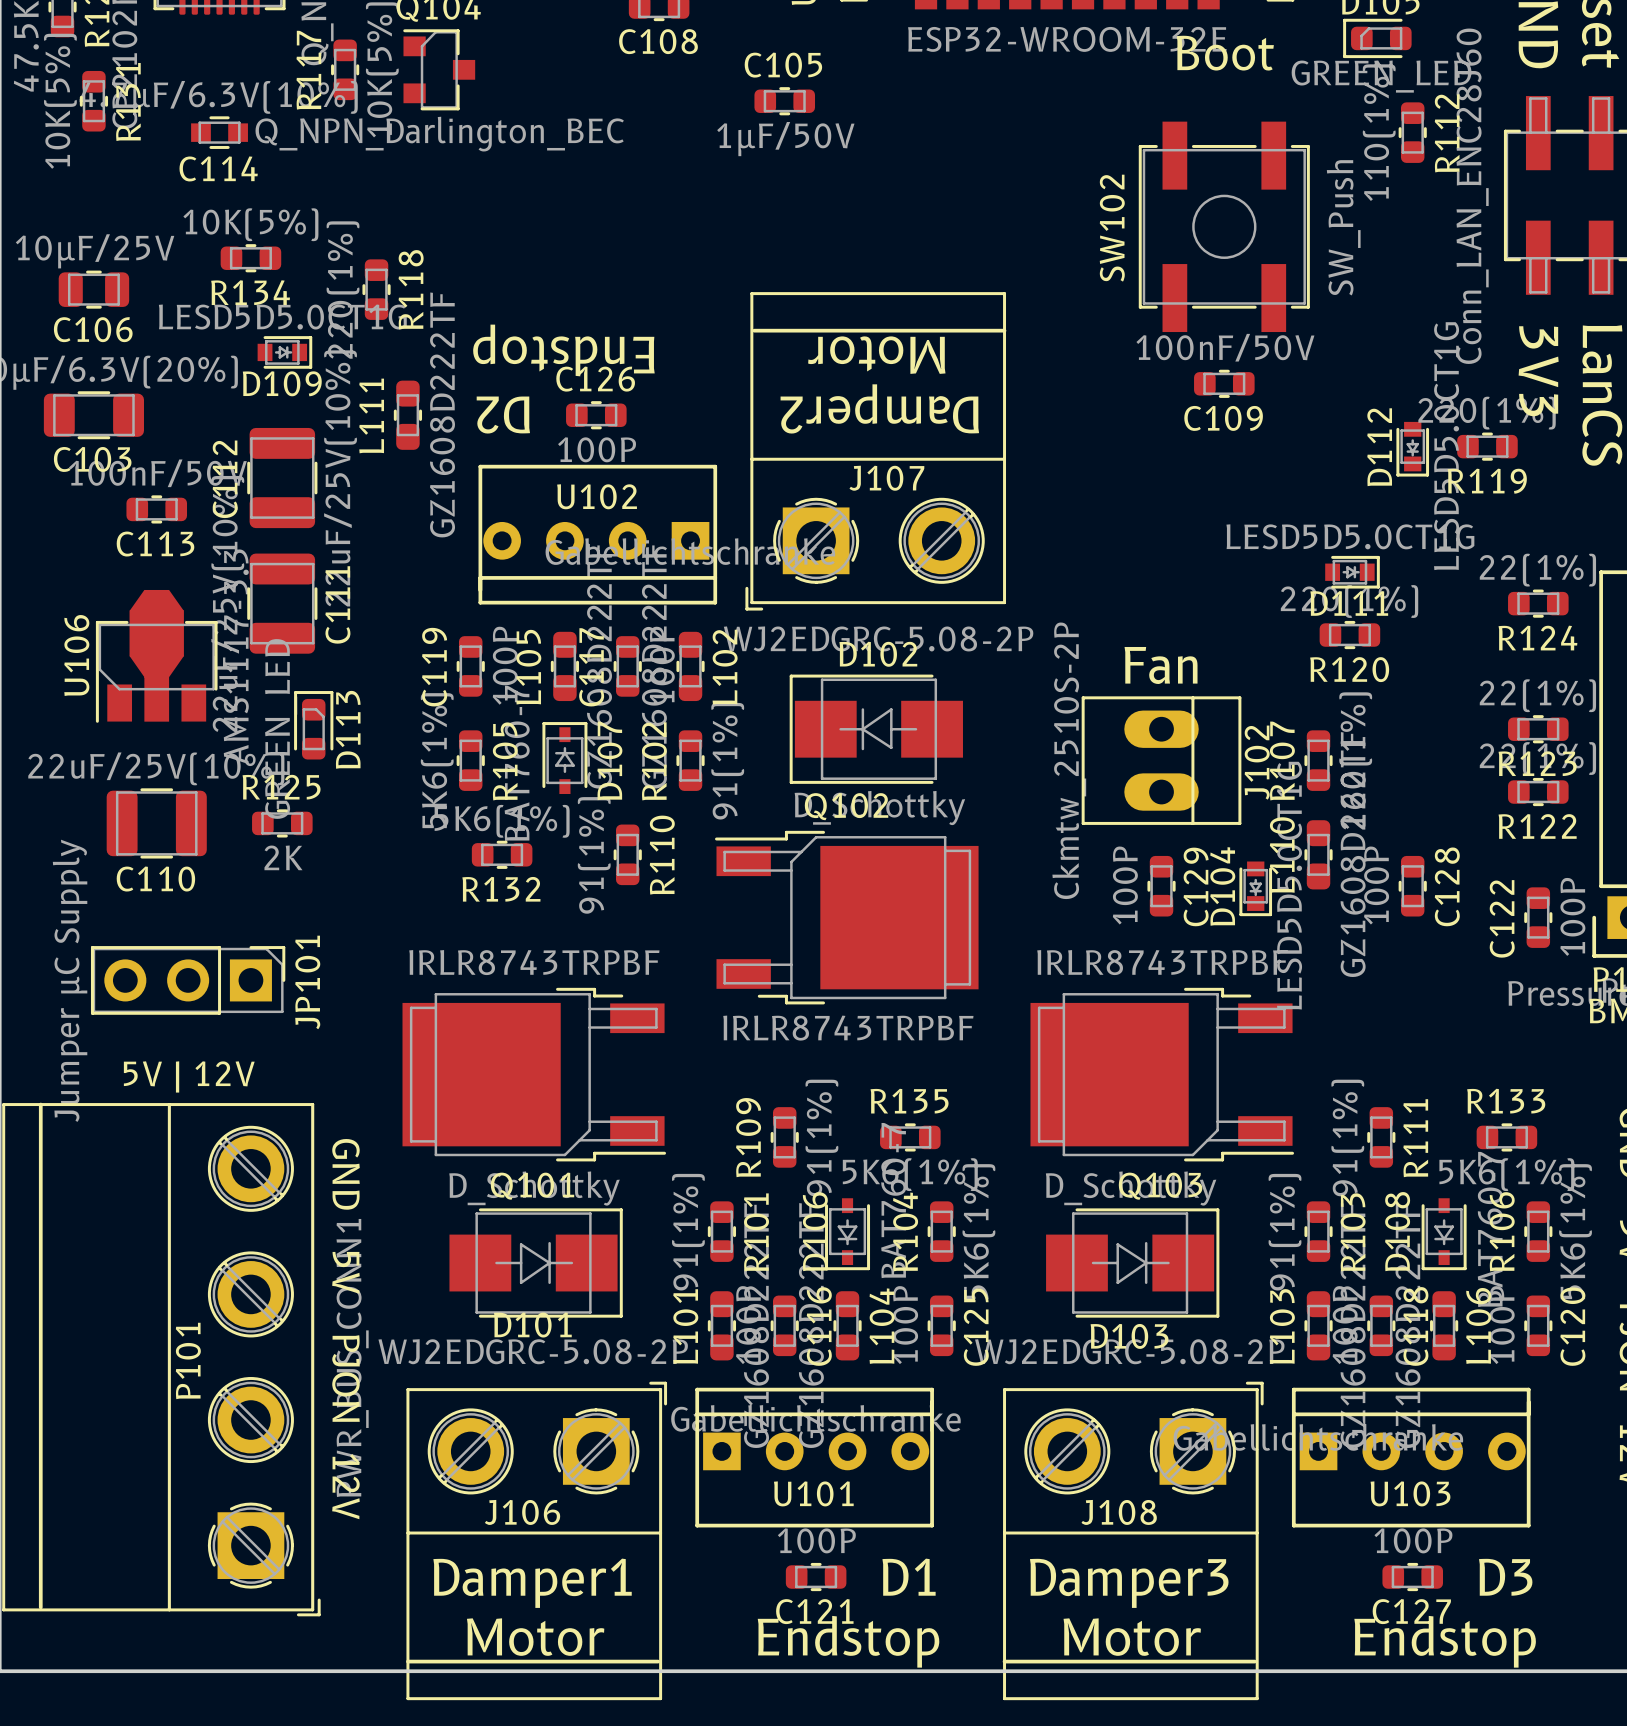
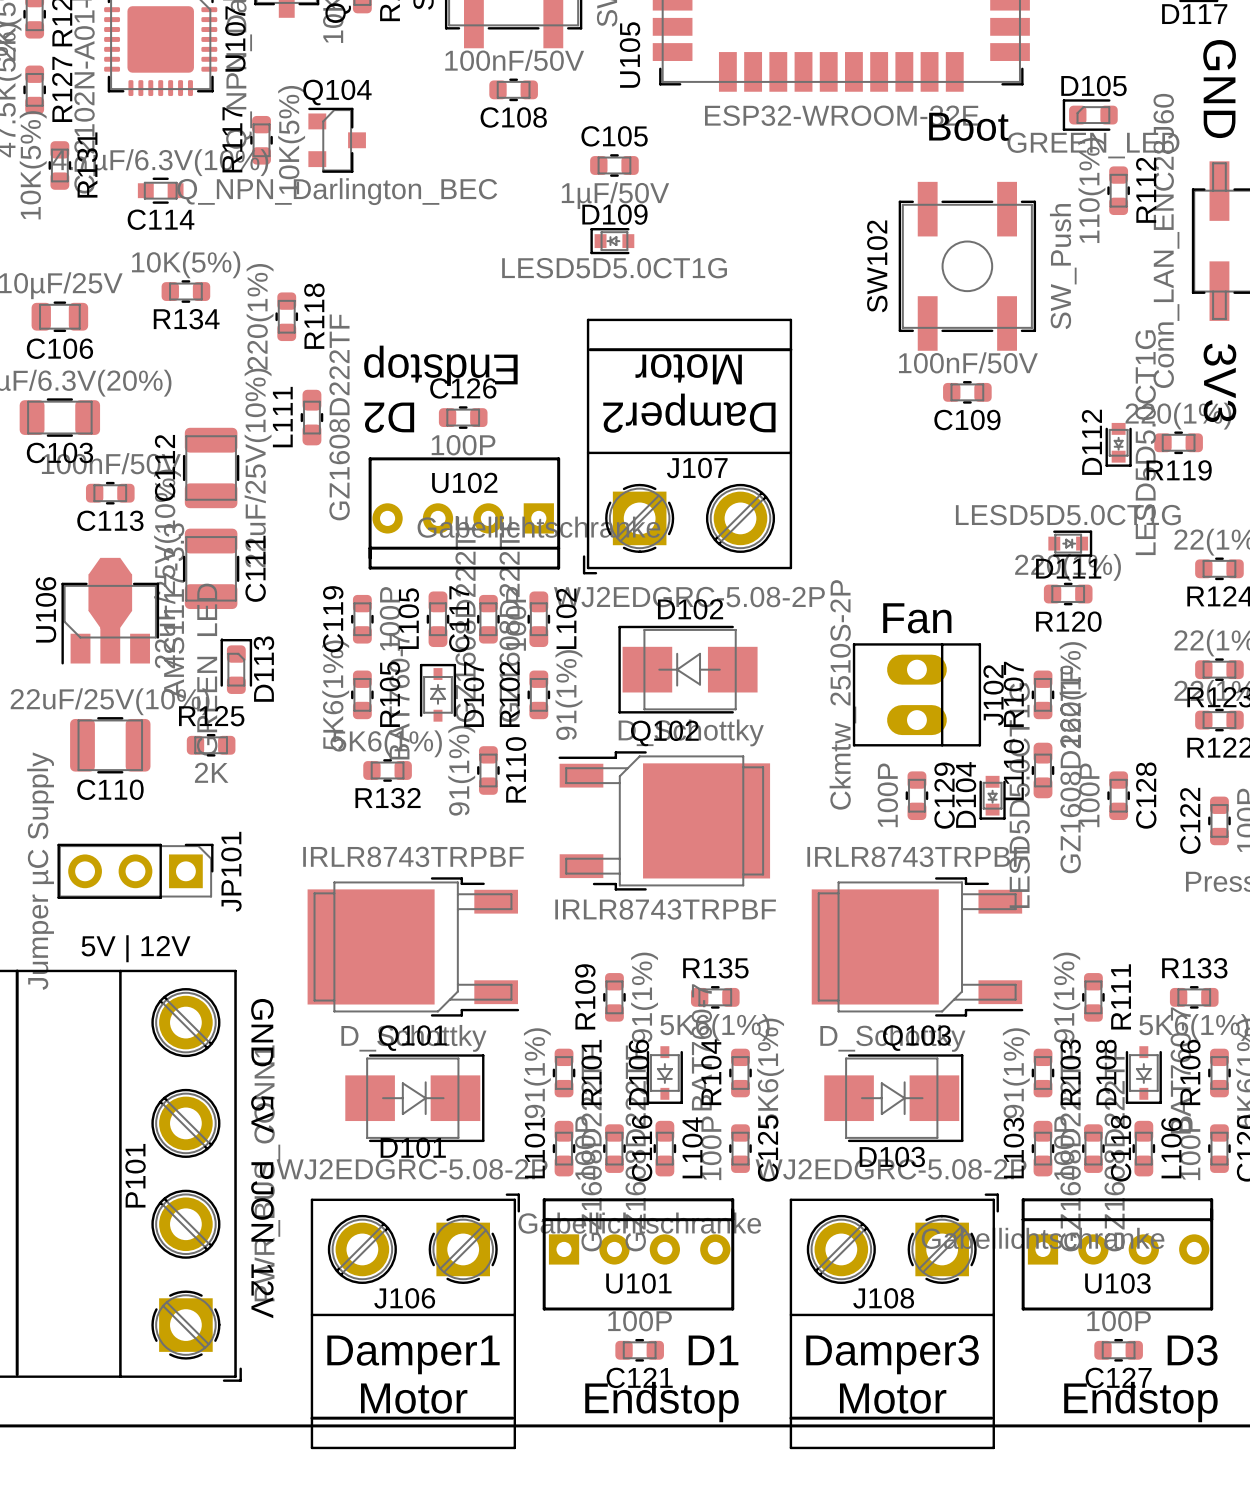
D109 rotation: 0° (284, 352) -> 180° (612, 241)
D109 position: (284, 352) -> (612, 241)

